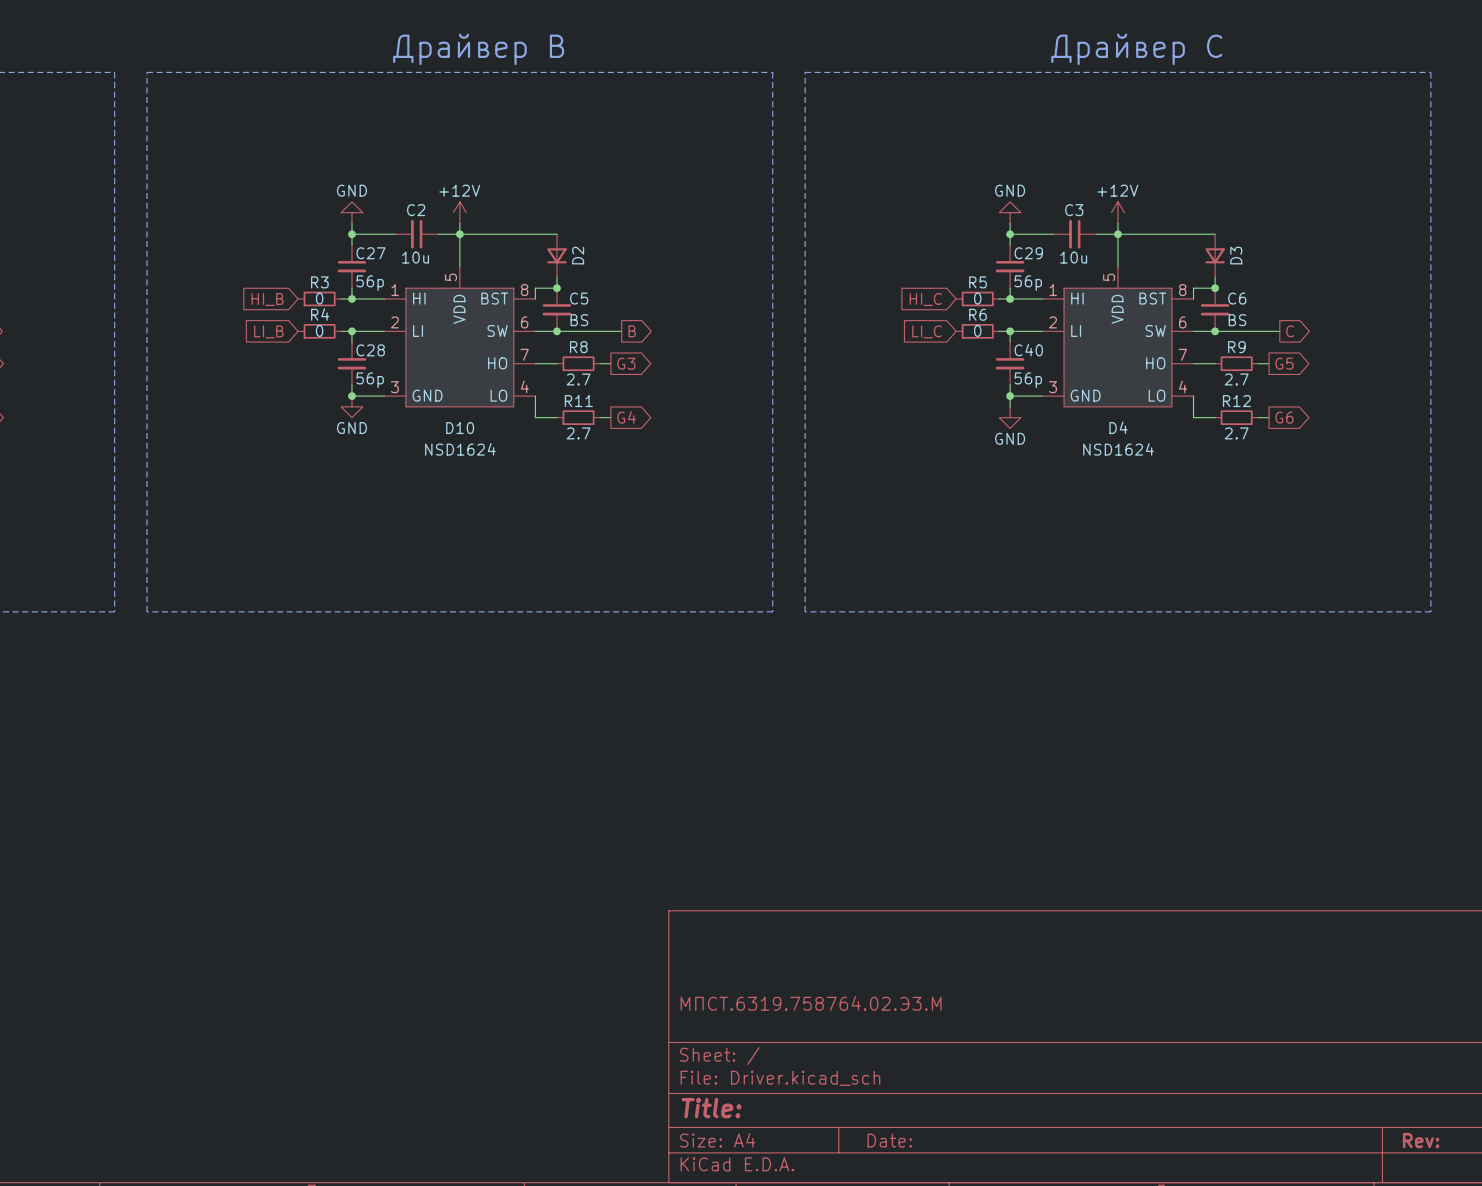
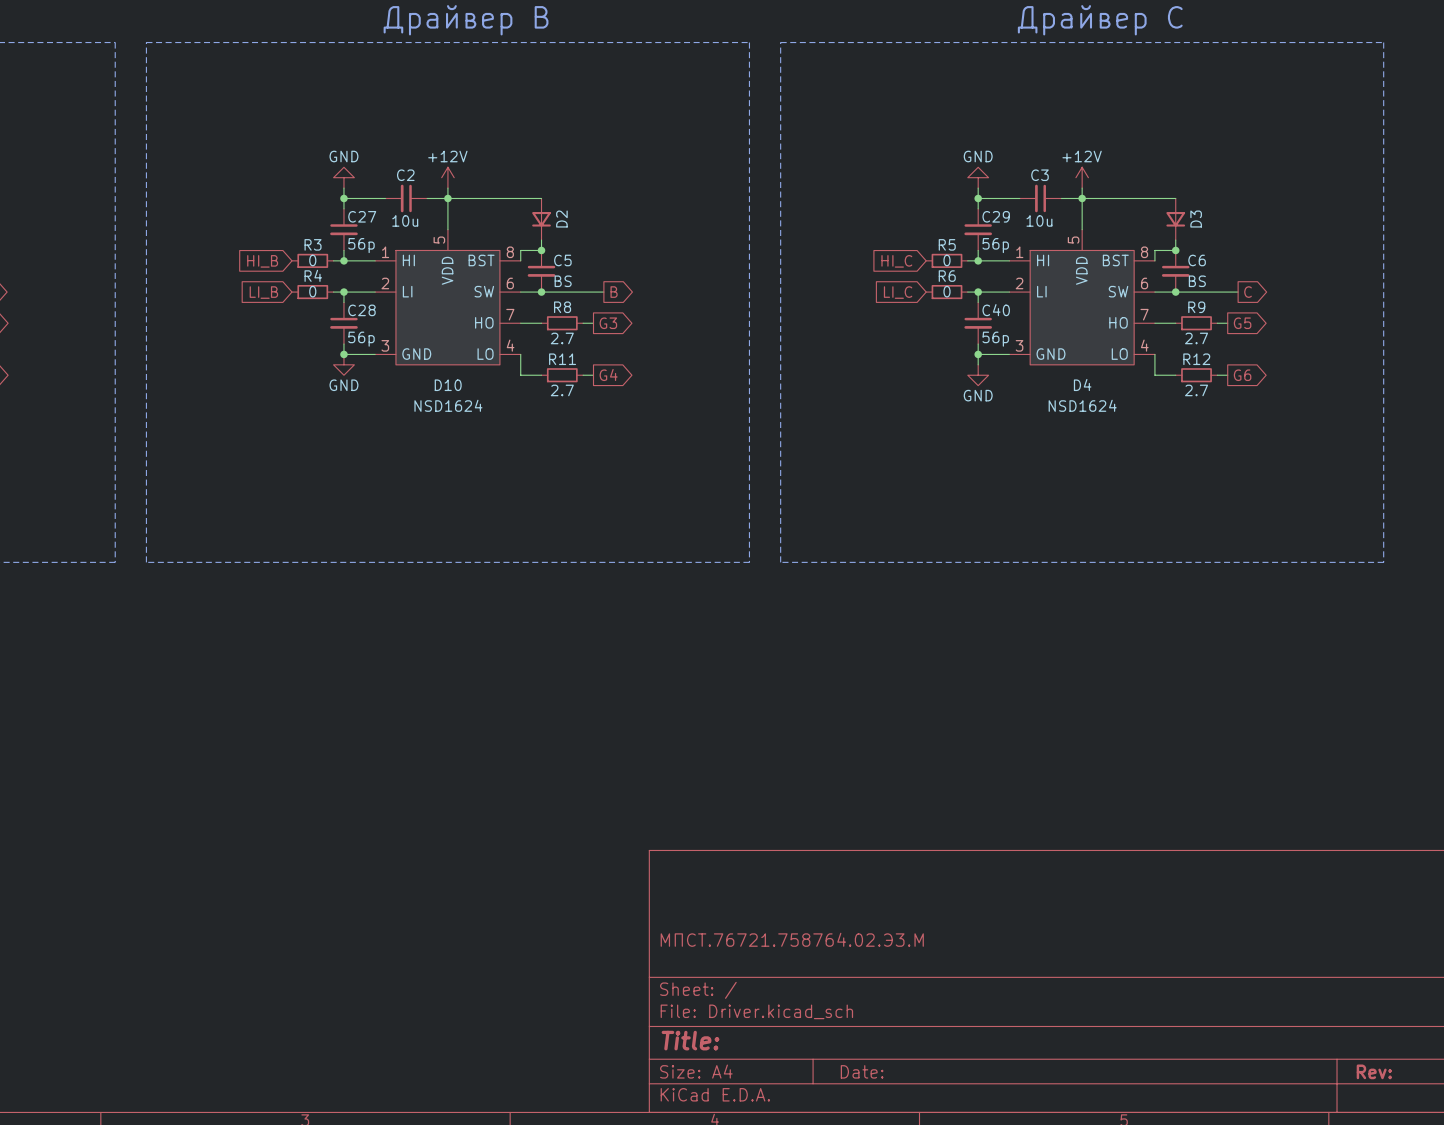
title block: МПСТ.6319.758764.02.Э3.М (811, 1003) -> МПСТ.76721.758764.02.Э3.М (792, 939)

